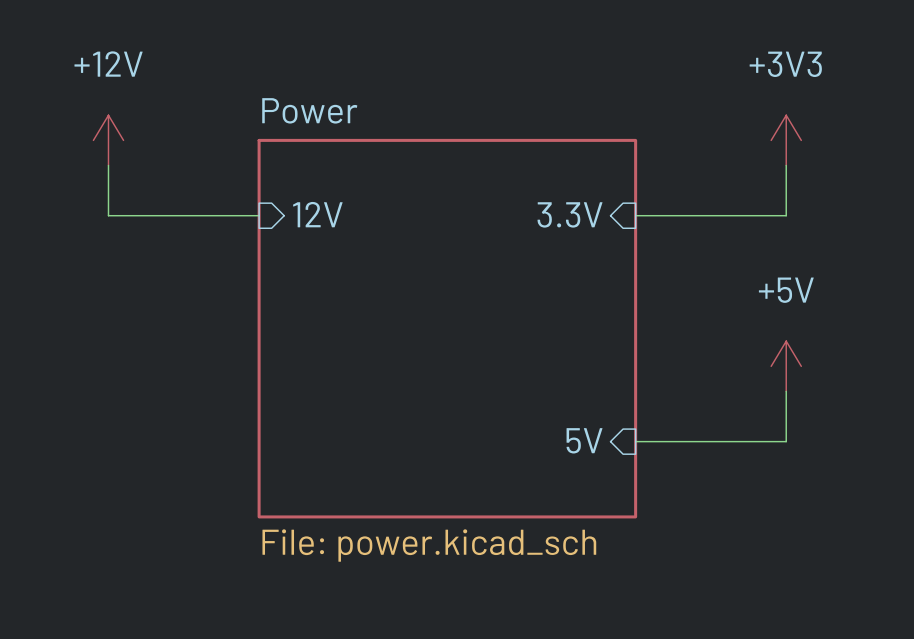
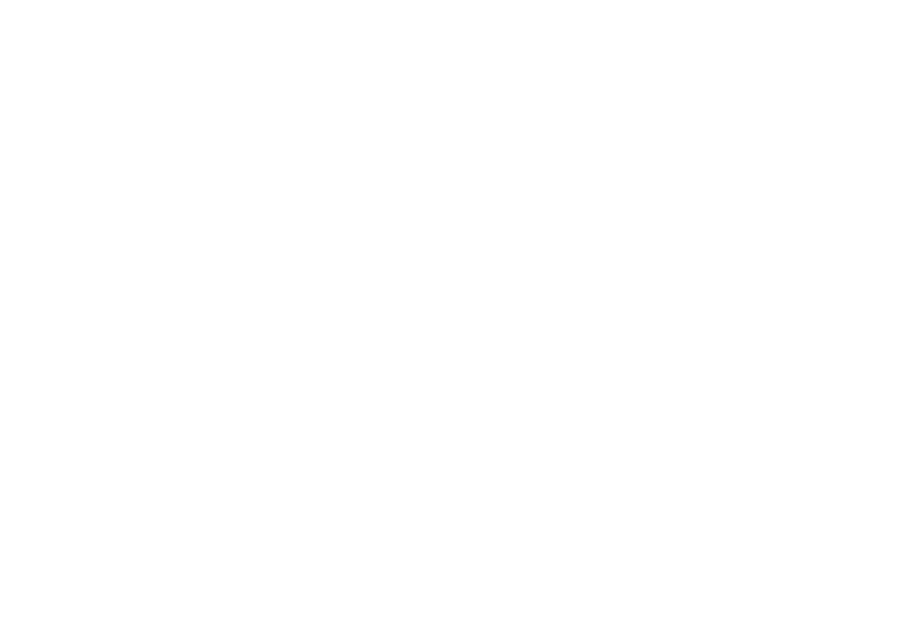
power symbol: +12V (108, 140) -> none
power symbol: +3V3 (786, 140) -> none
wire: (108, 165) (108, 215) (259, 215) -> none
wire: (786, 165) (786, 215) (635, 215) -> none
sheet pin: 12V (317, 214) -> none
sheet pin: 3.3V (570, 214) -> none
sheet Power: File: power.kicad_sch (447, 328) -> none
power symbol: +5V (786, 366) -> none
wire: (786, 391) (786, 441) (635, 441) -> none
sheet pin: 5V (584, 440) -> none

